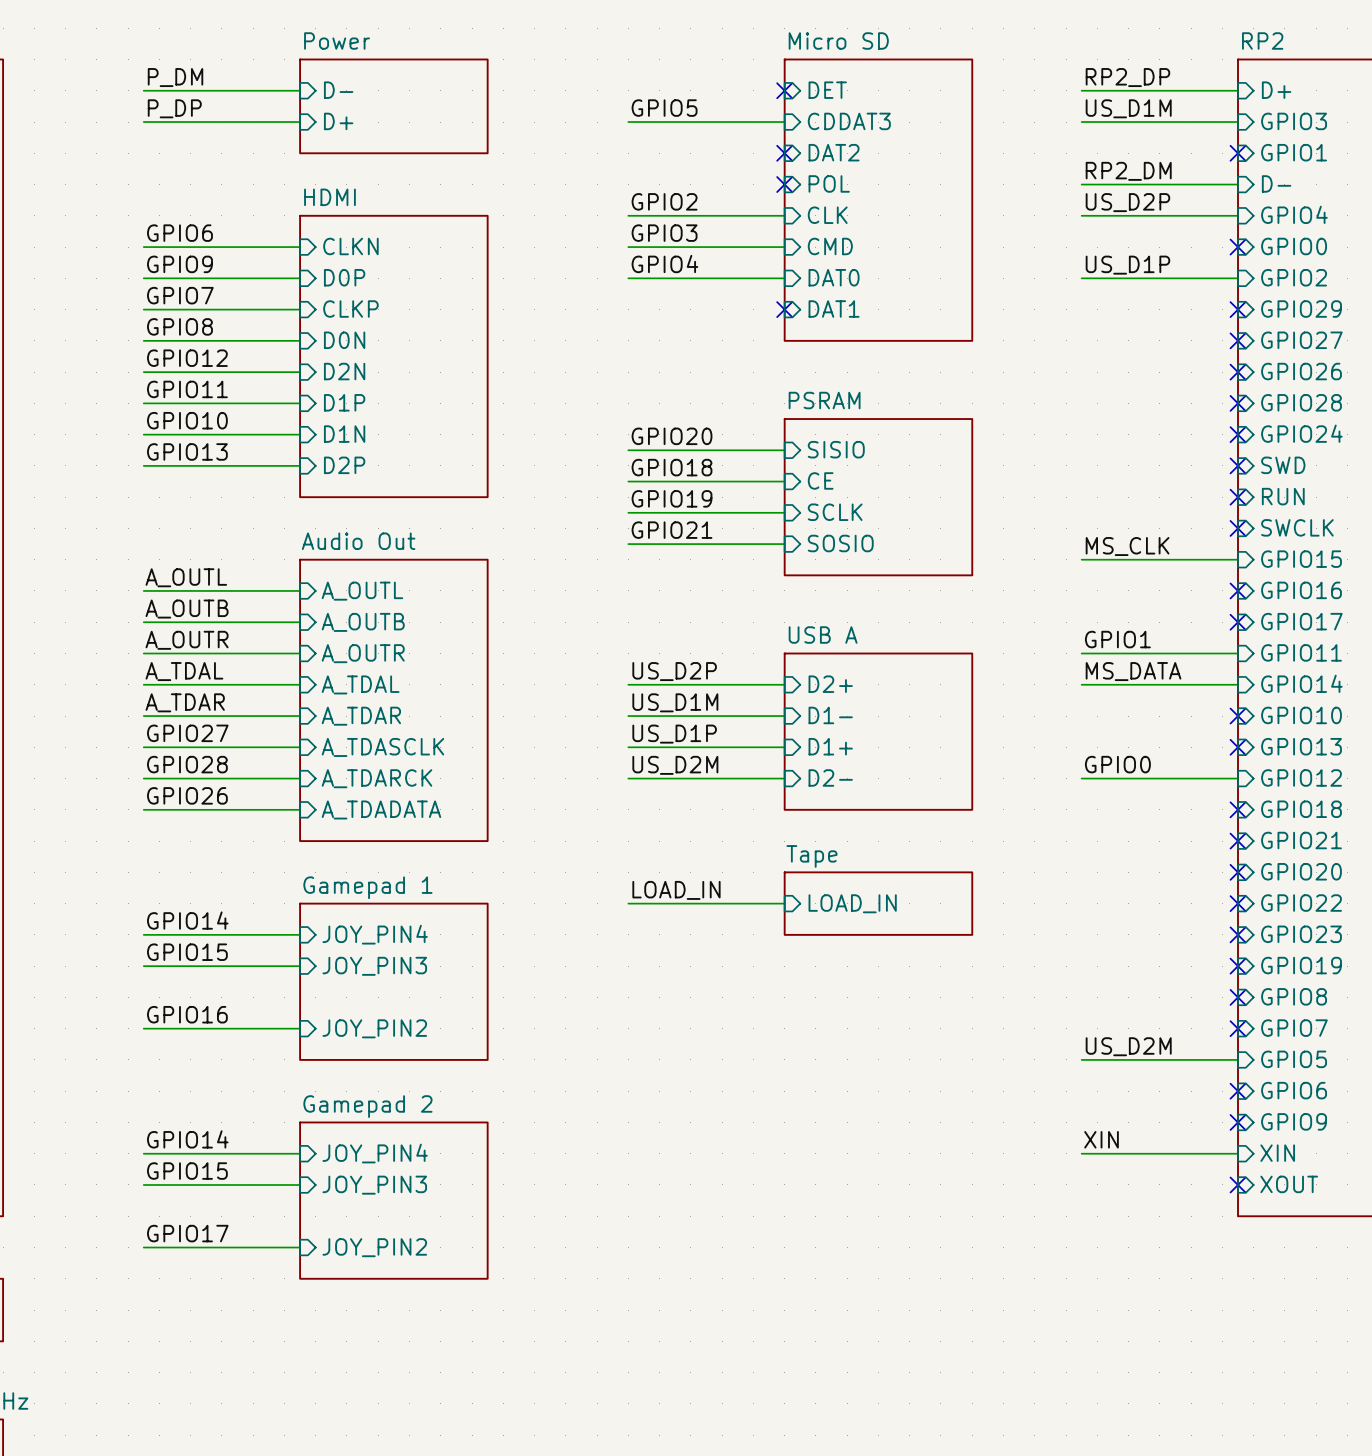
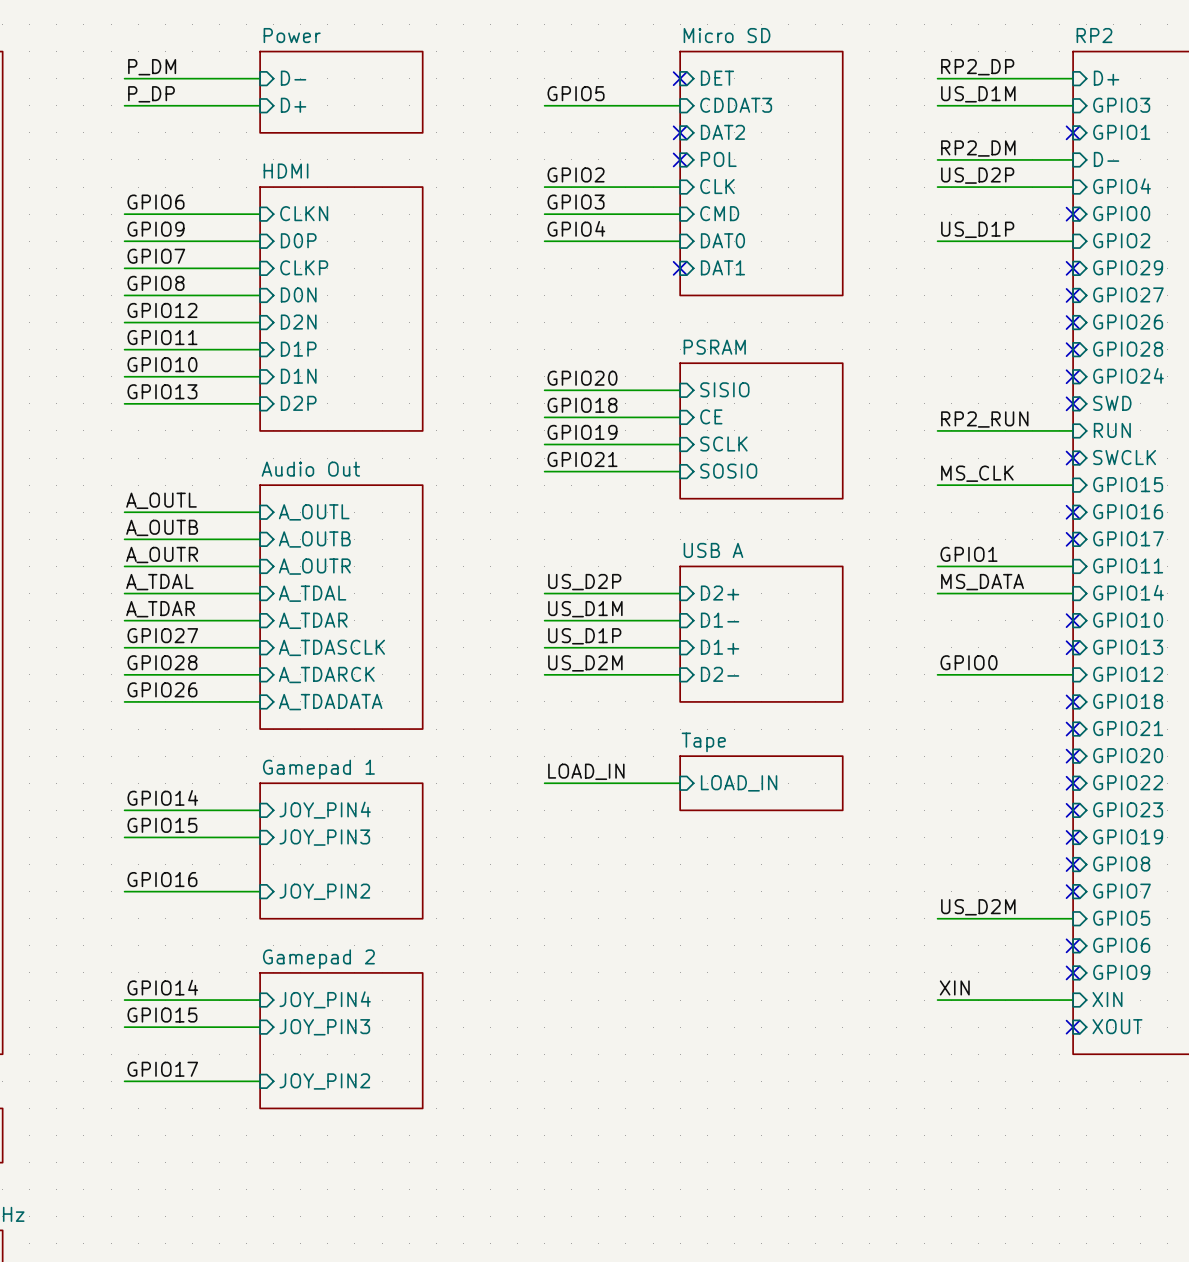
label: none -> RP2_RUN (984, 419)
wire: none -> (937, 430) (1073, 430)
no-connect mark: (1238, 497) -> none

